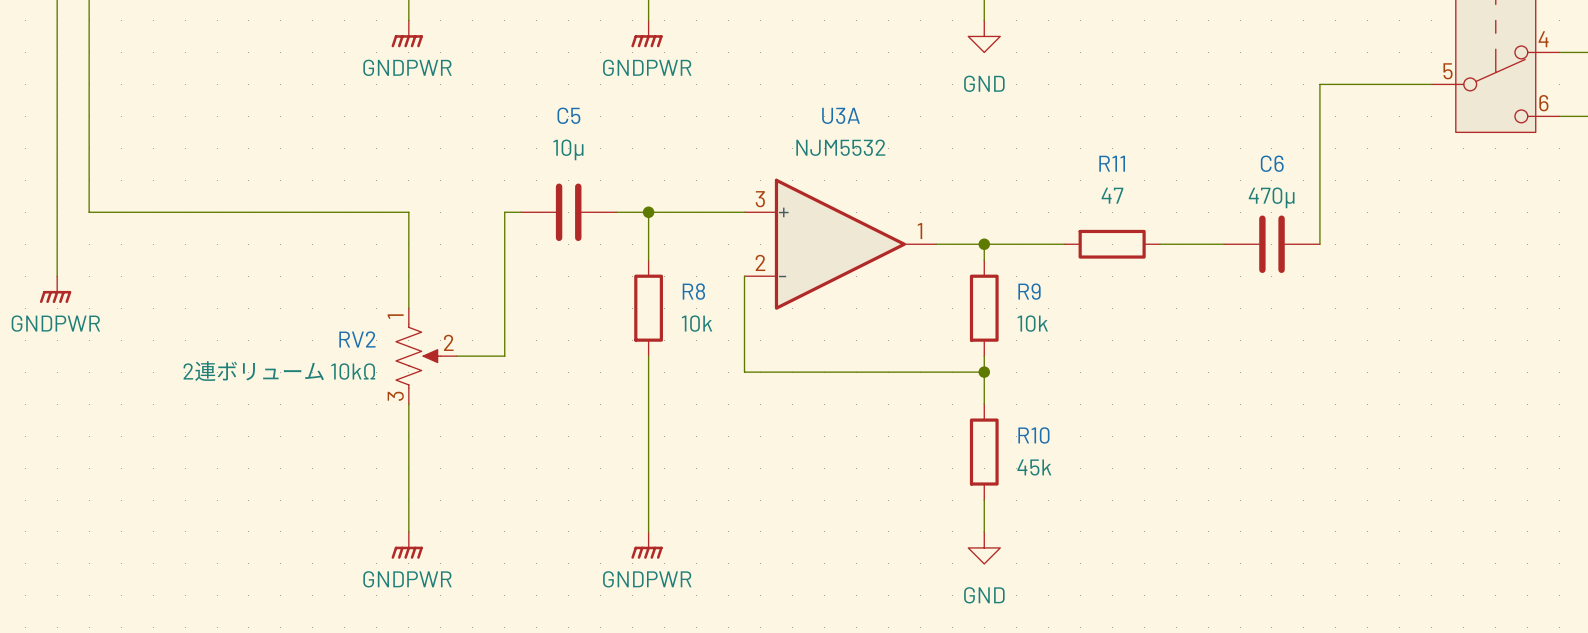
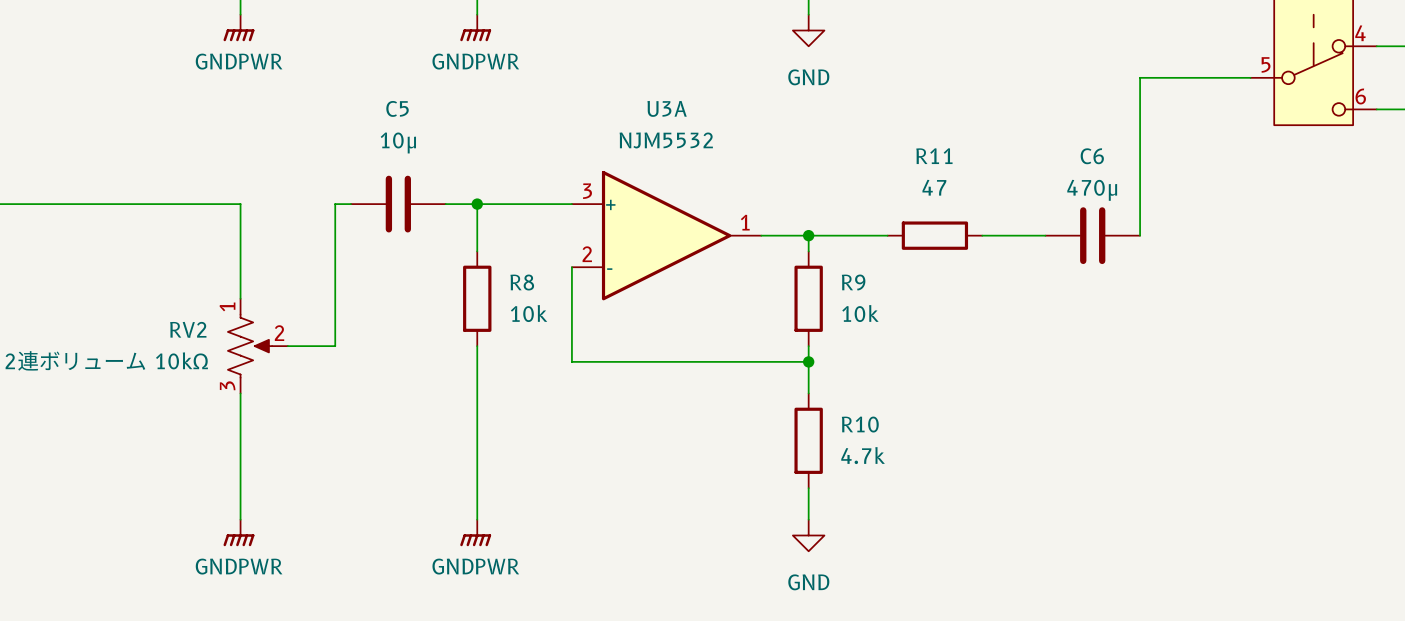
R10 value: 45k (1034, 467) -> 4.7k (863, 455)

